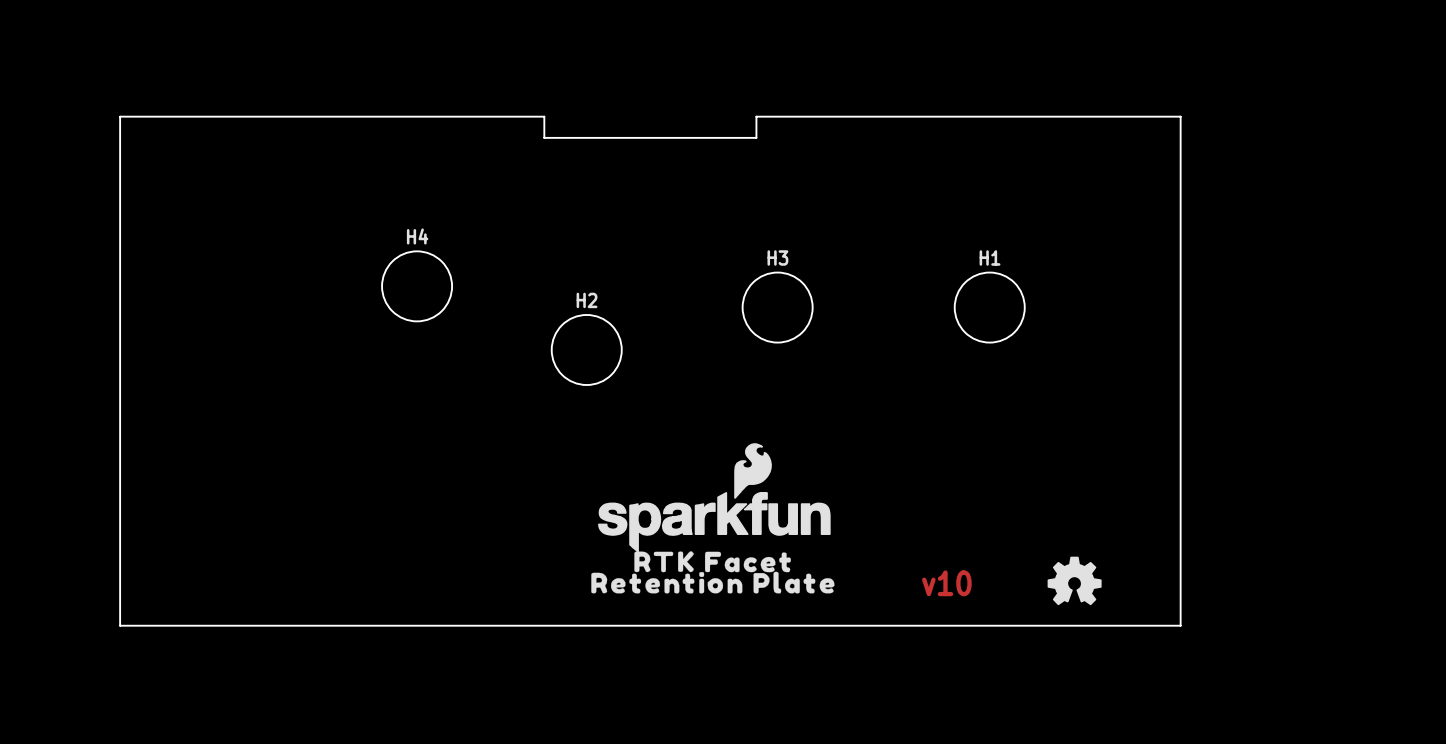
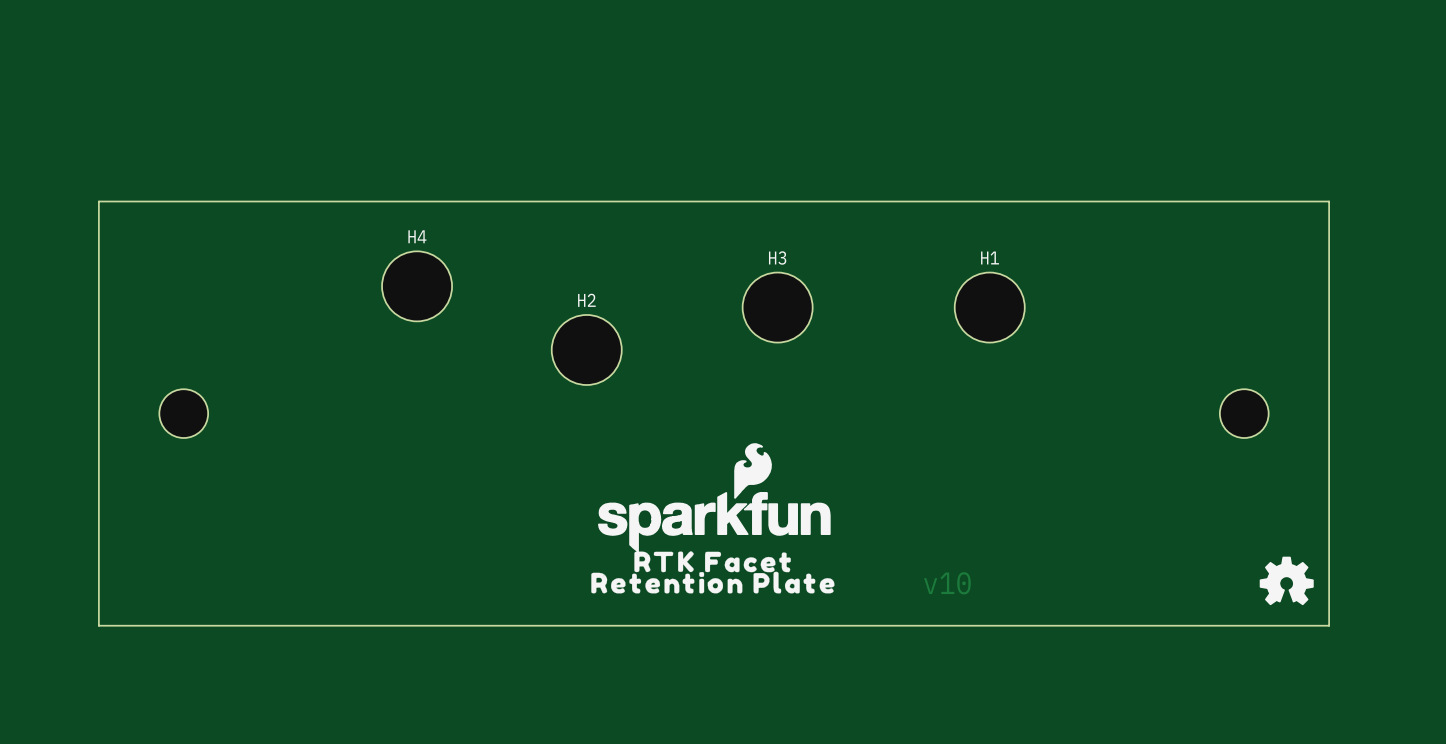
hole: none -> (183, 413)
hole: none -> (1244, 413)
drawing position: (1074, 580) -> (1286, 580)
board edge: (120, 625) (120, 116) (544, 116) (544, 137) (756, 137) (756, 116) (1180, 116) (1180, 625) -> (120, 625) (98, 625) (98, 201) (1329, 201) (1329, 625) (1180, 625)

